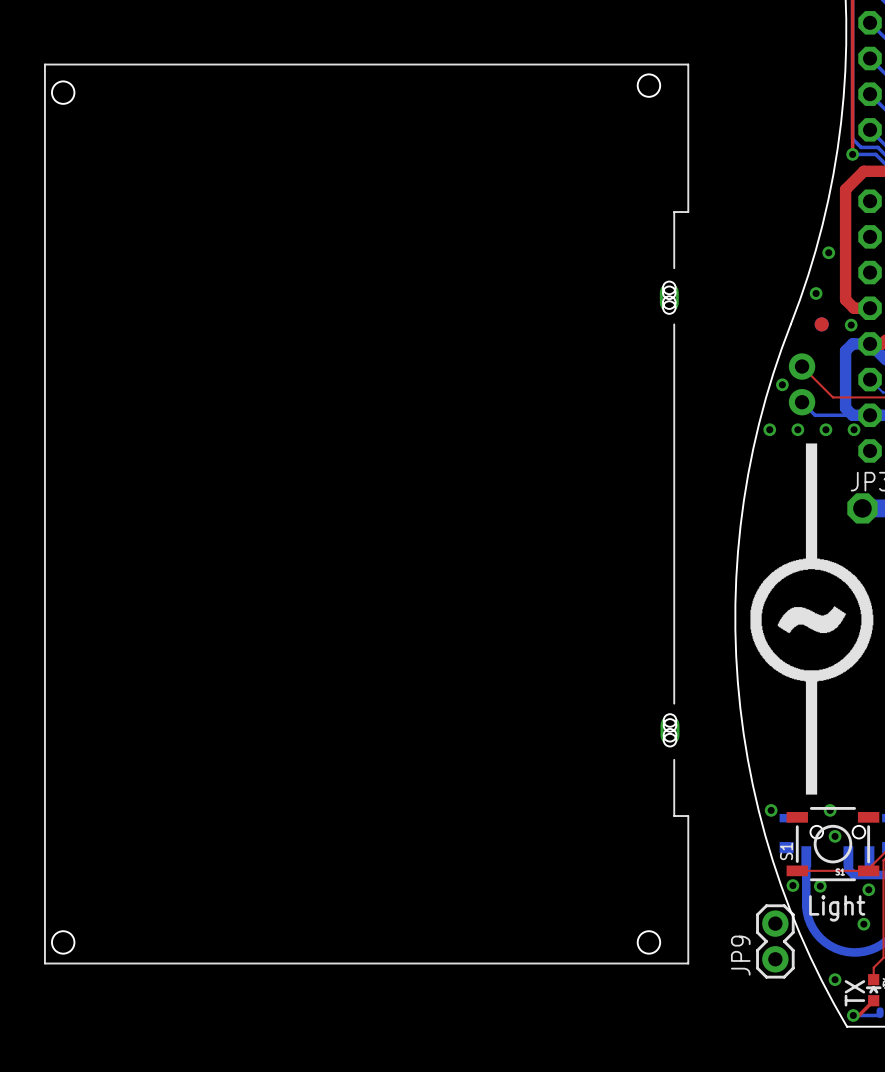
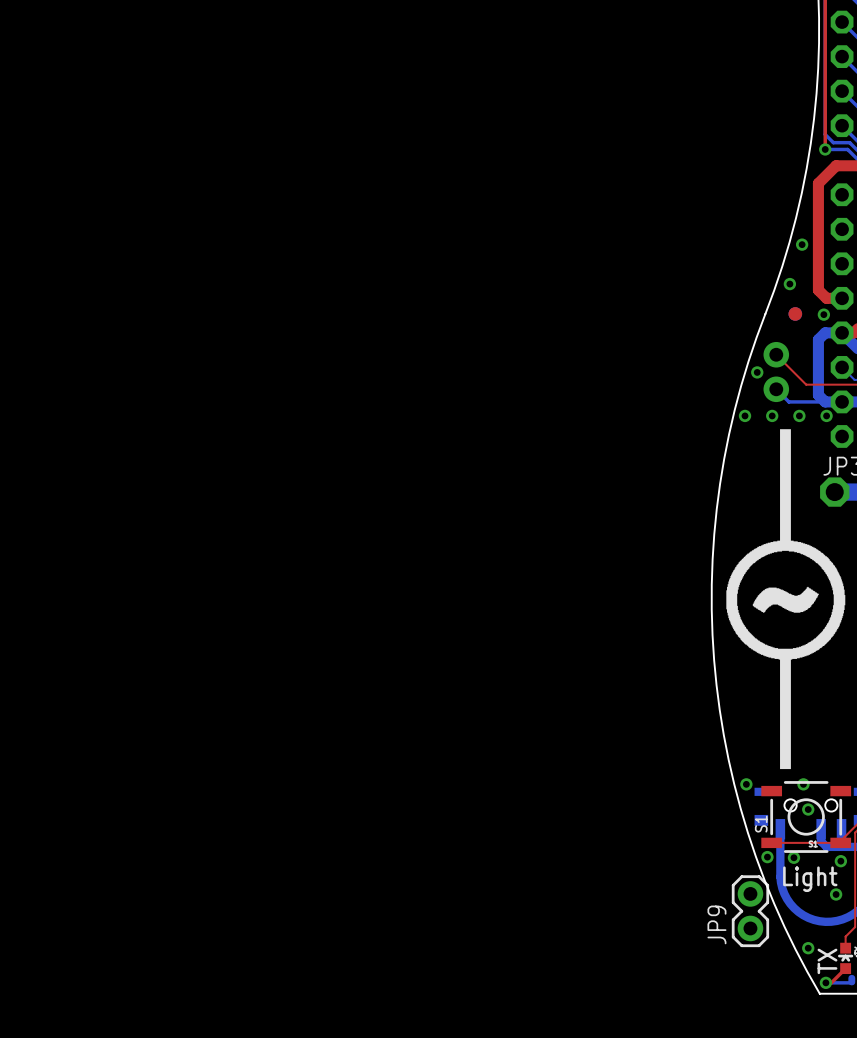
part: (366, 514) -> none

